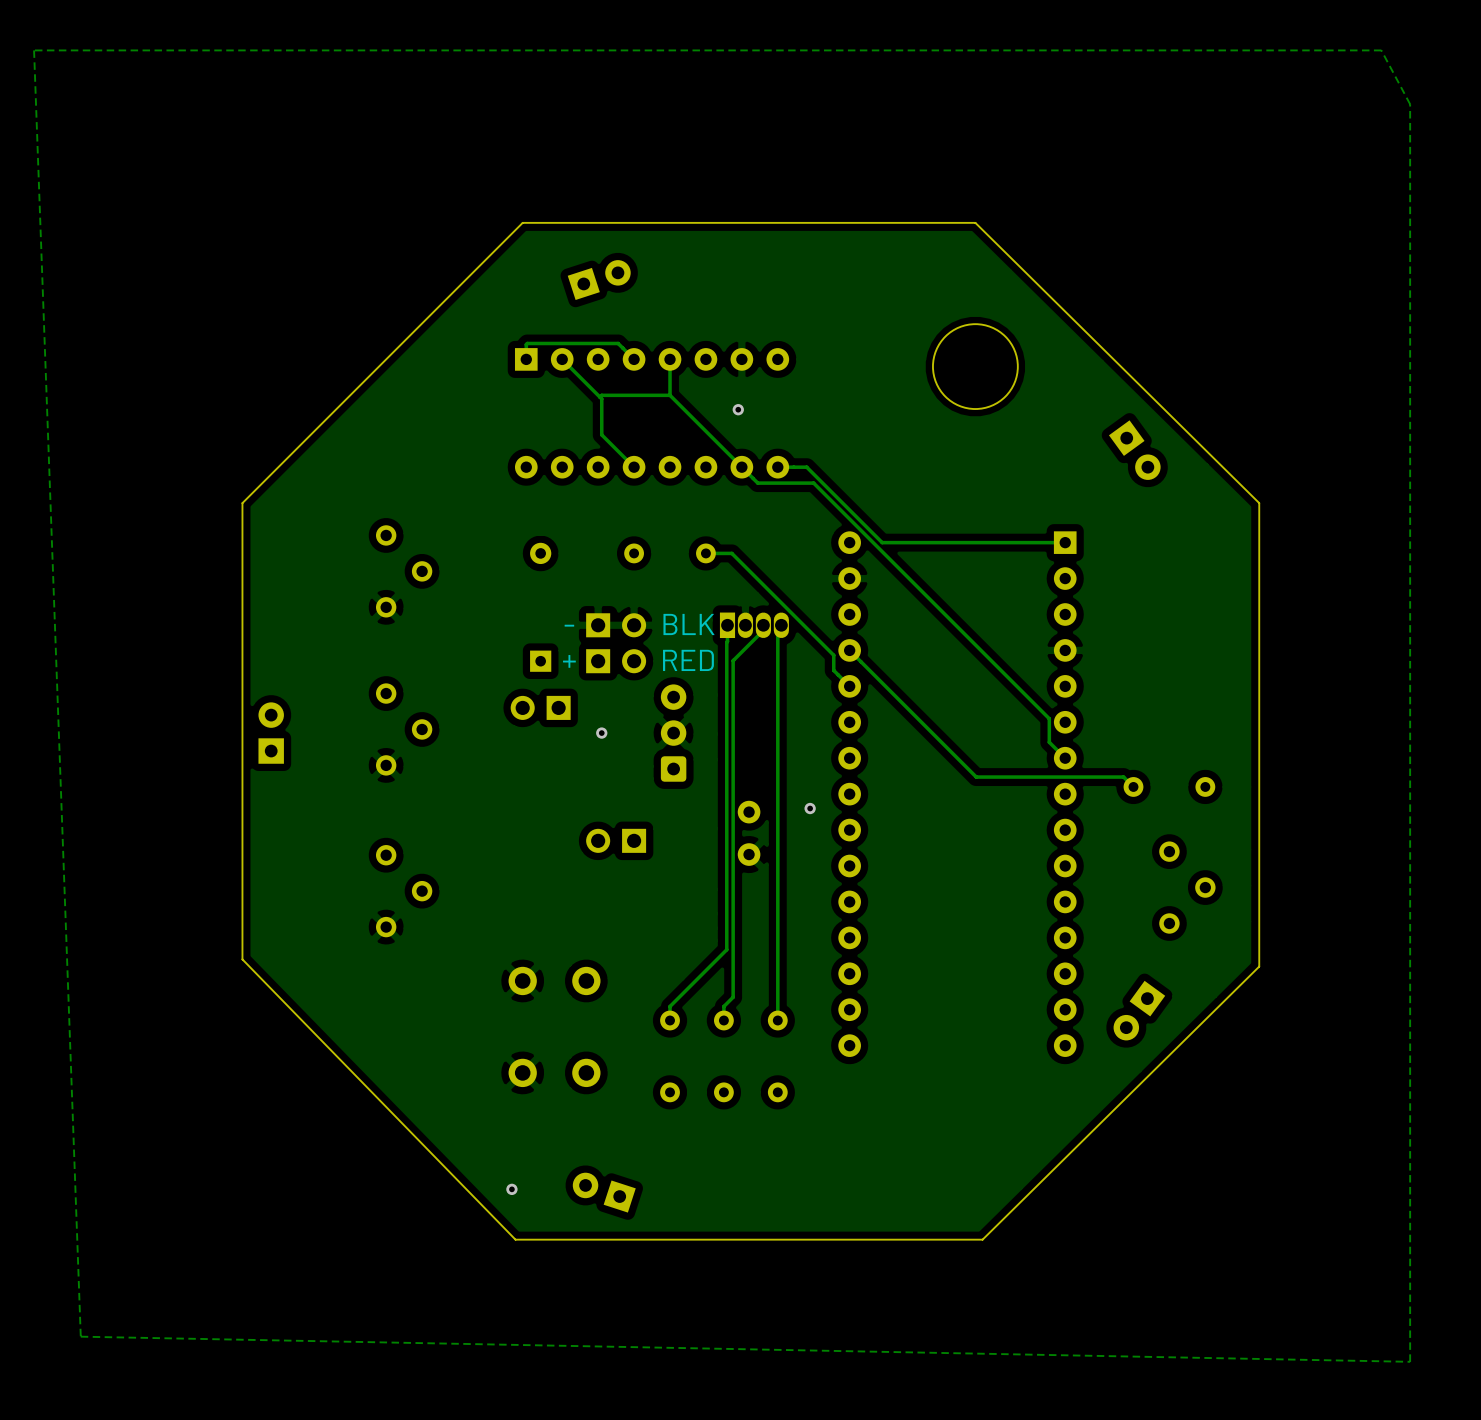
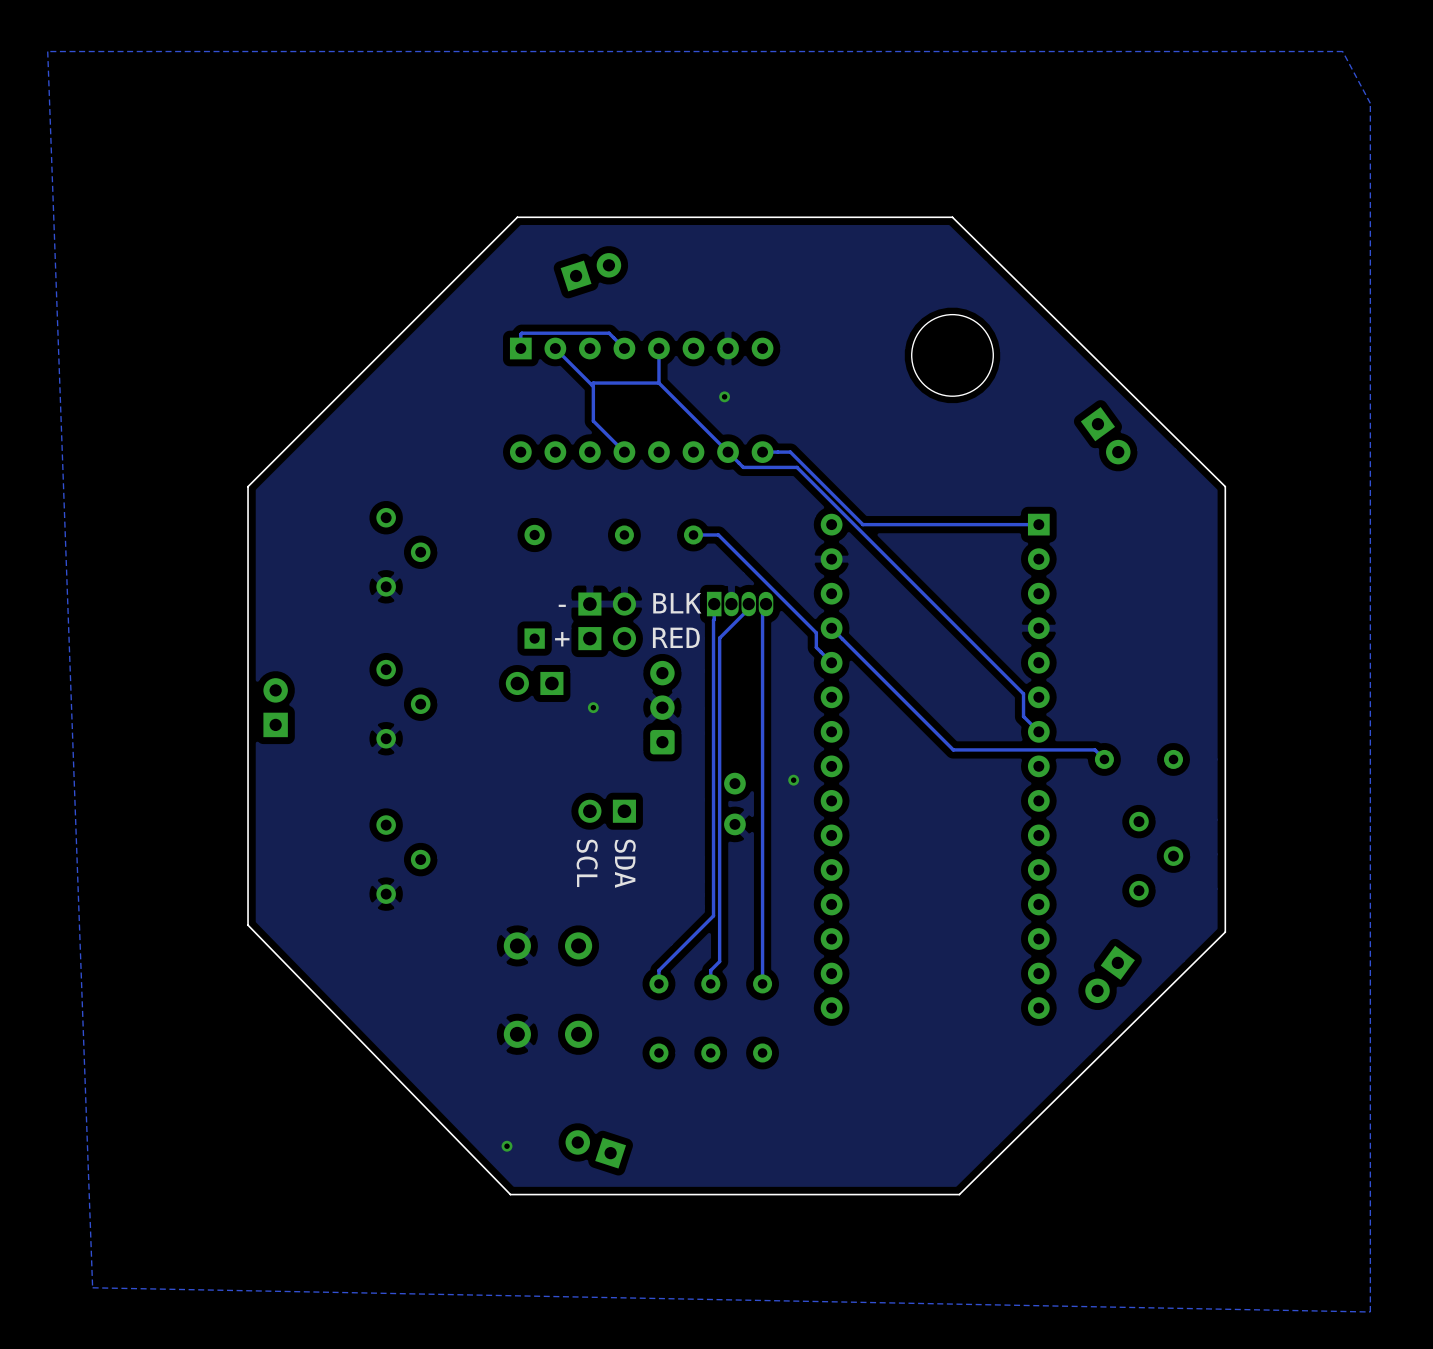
text: none -> SCL (587, 863)
text: none -> SDA (625, 863)

